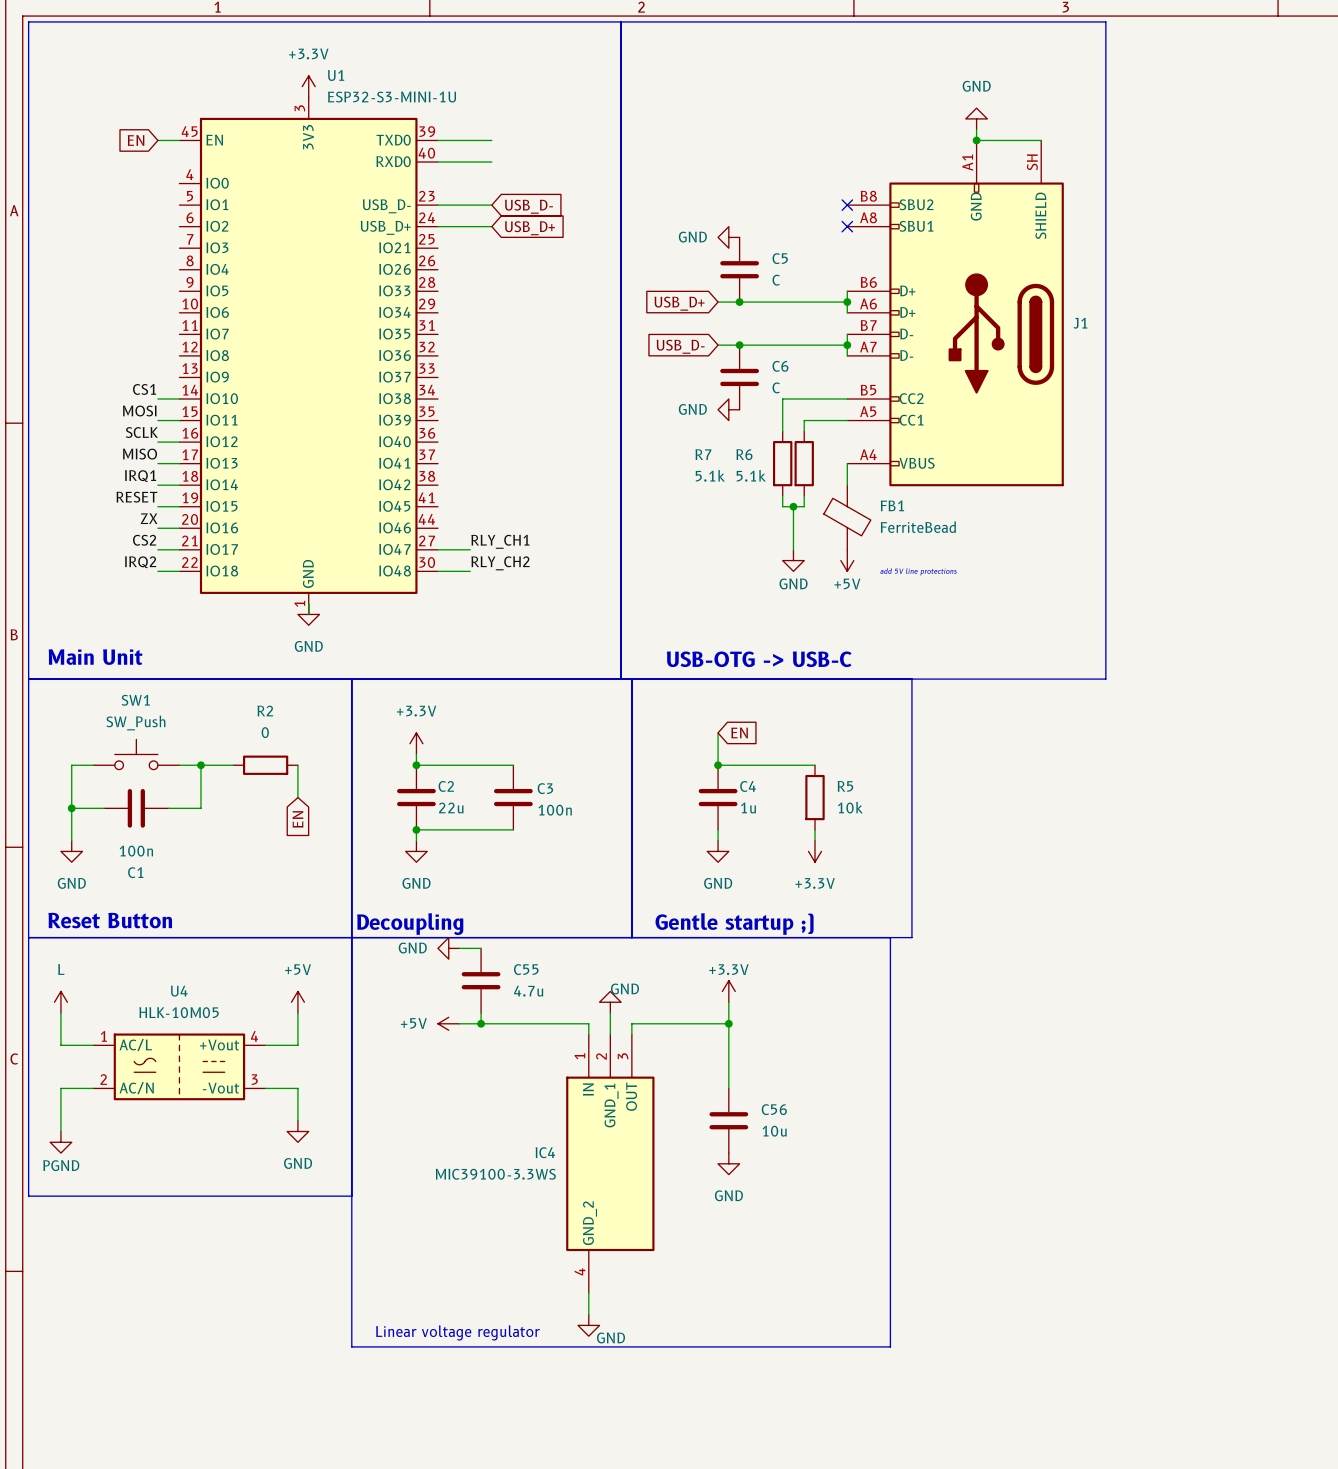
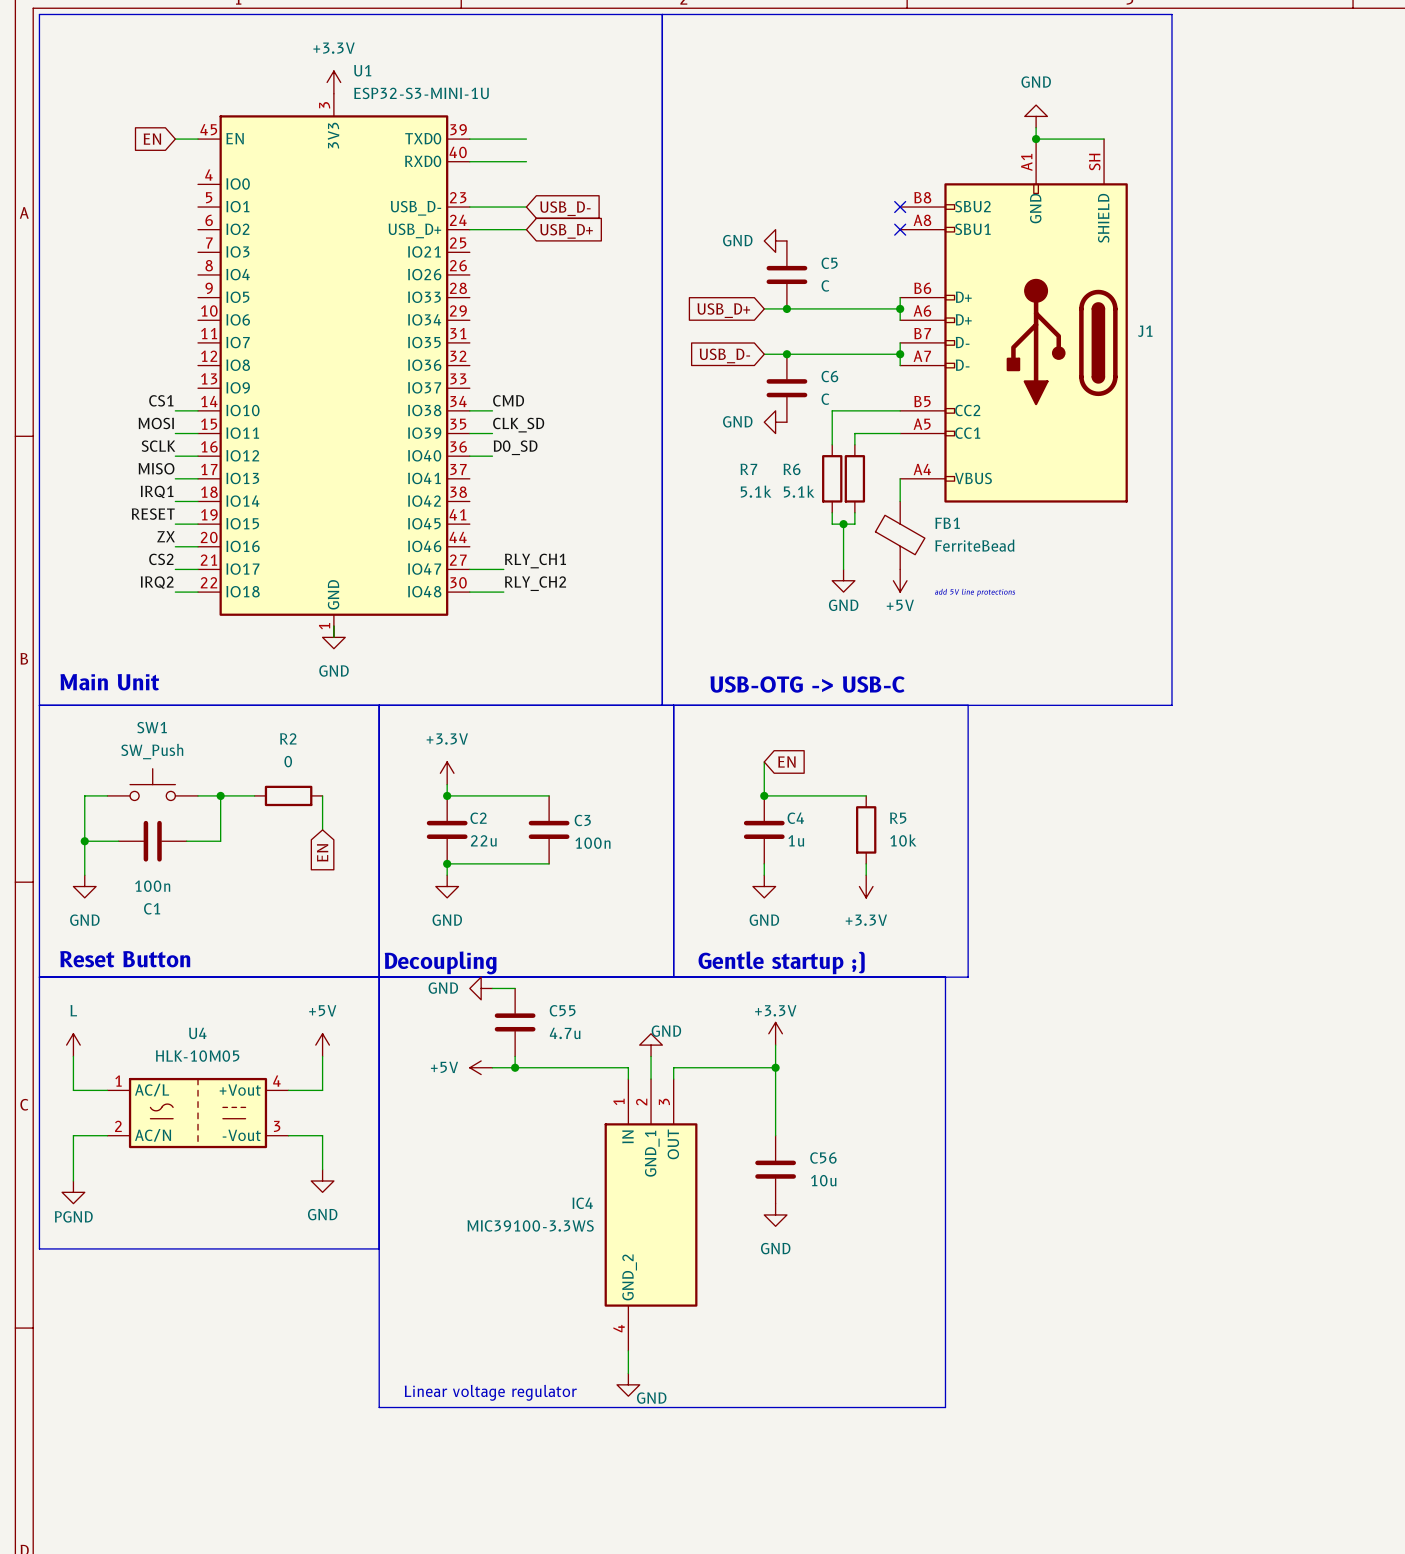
label: none -> CMD (508, 400)
wire: none -> (469, 410) (492, 410)
label: none -> CLK_SD (518, 425)
wire: none -> (469, 433) (492, 433)
label: none -> D0_SD (515, 447)
wire: none -> (469, 456) (492, 456)

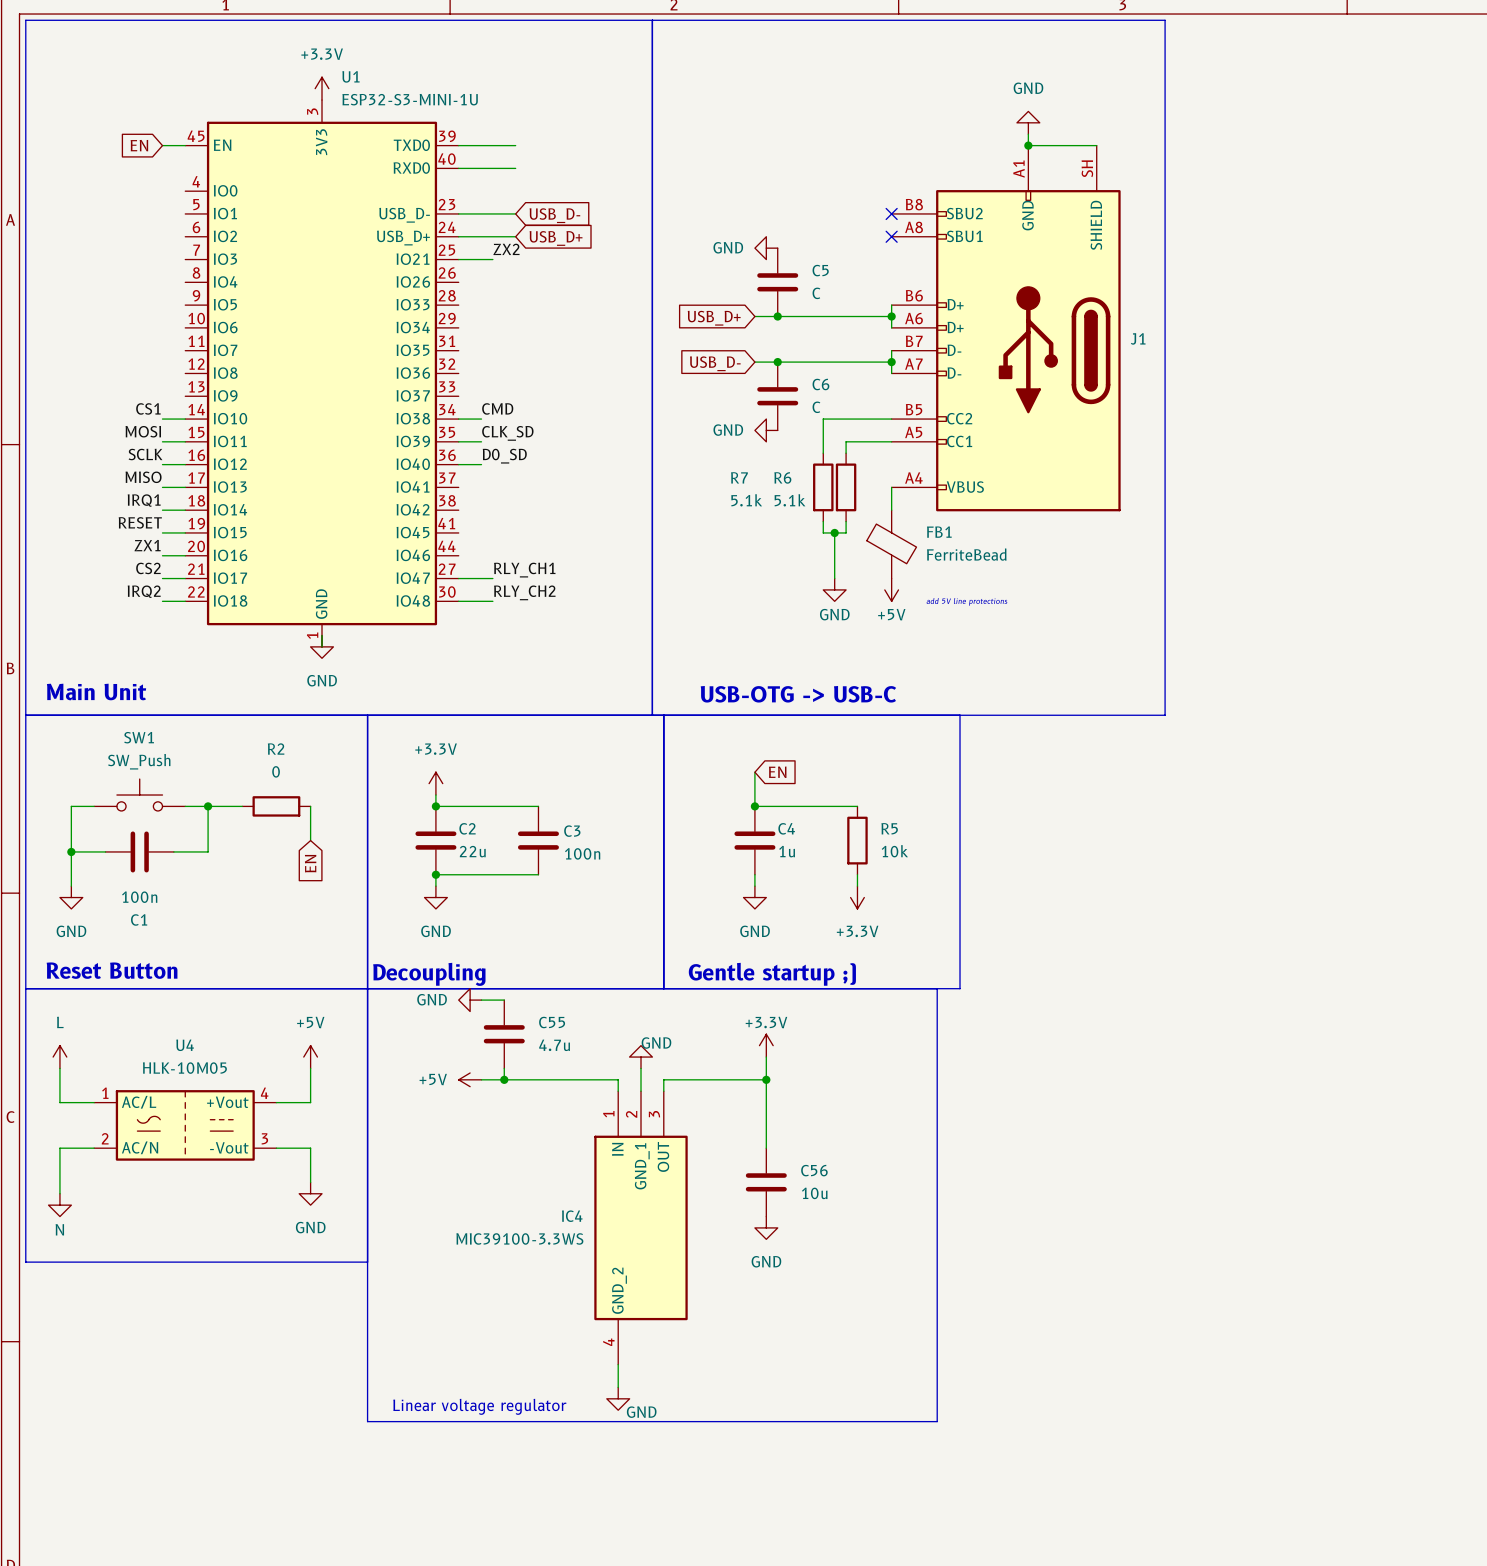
label: none -> ZX2 (506, 249)
wire: none -> (458, 259) (492, 259)
label: ZX (166, 536) -> ZX1 (147, 545)
power symbol: PGND (73, 1192) -> N (59, 1205)

